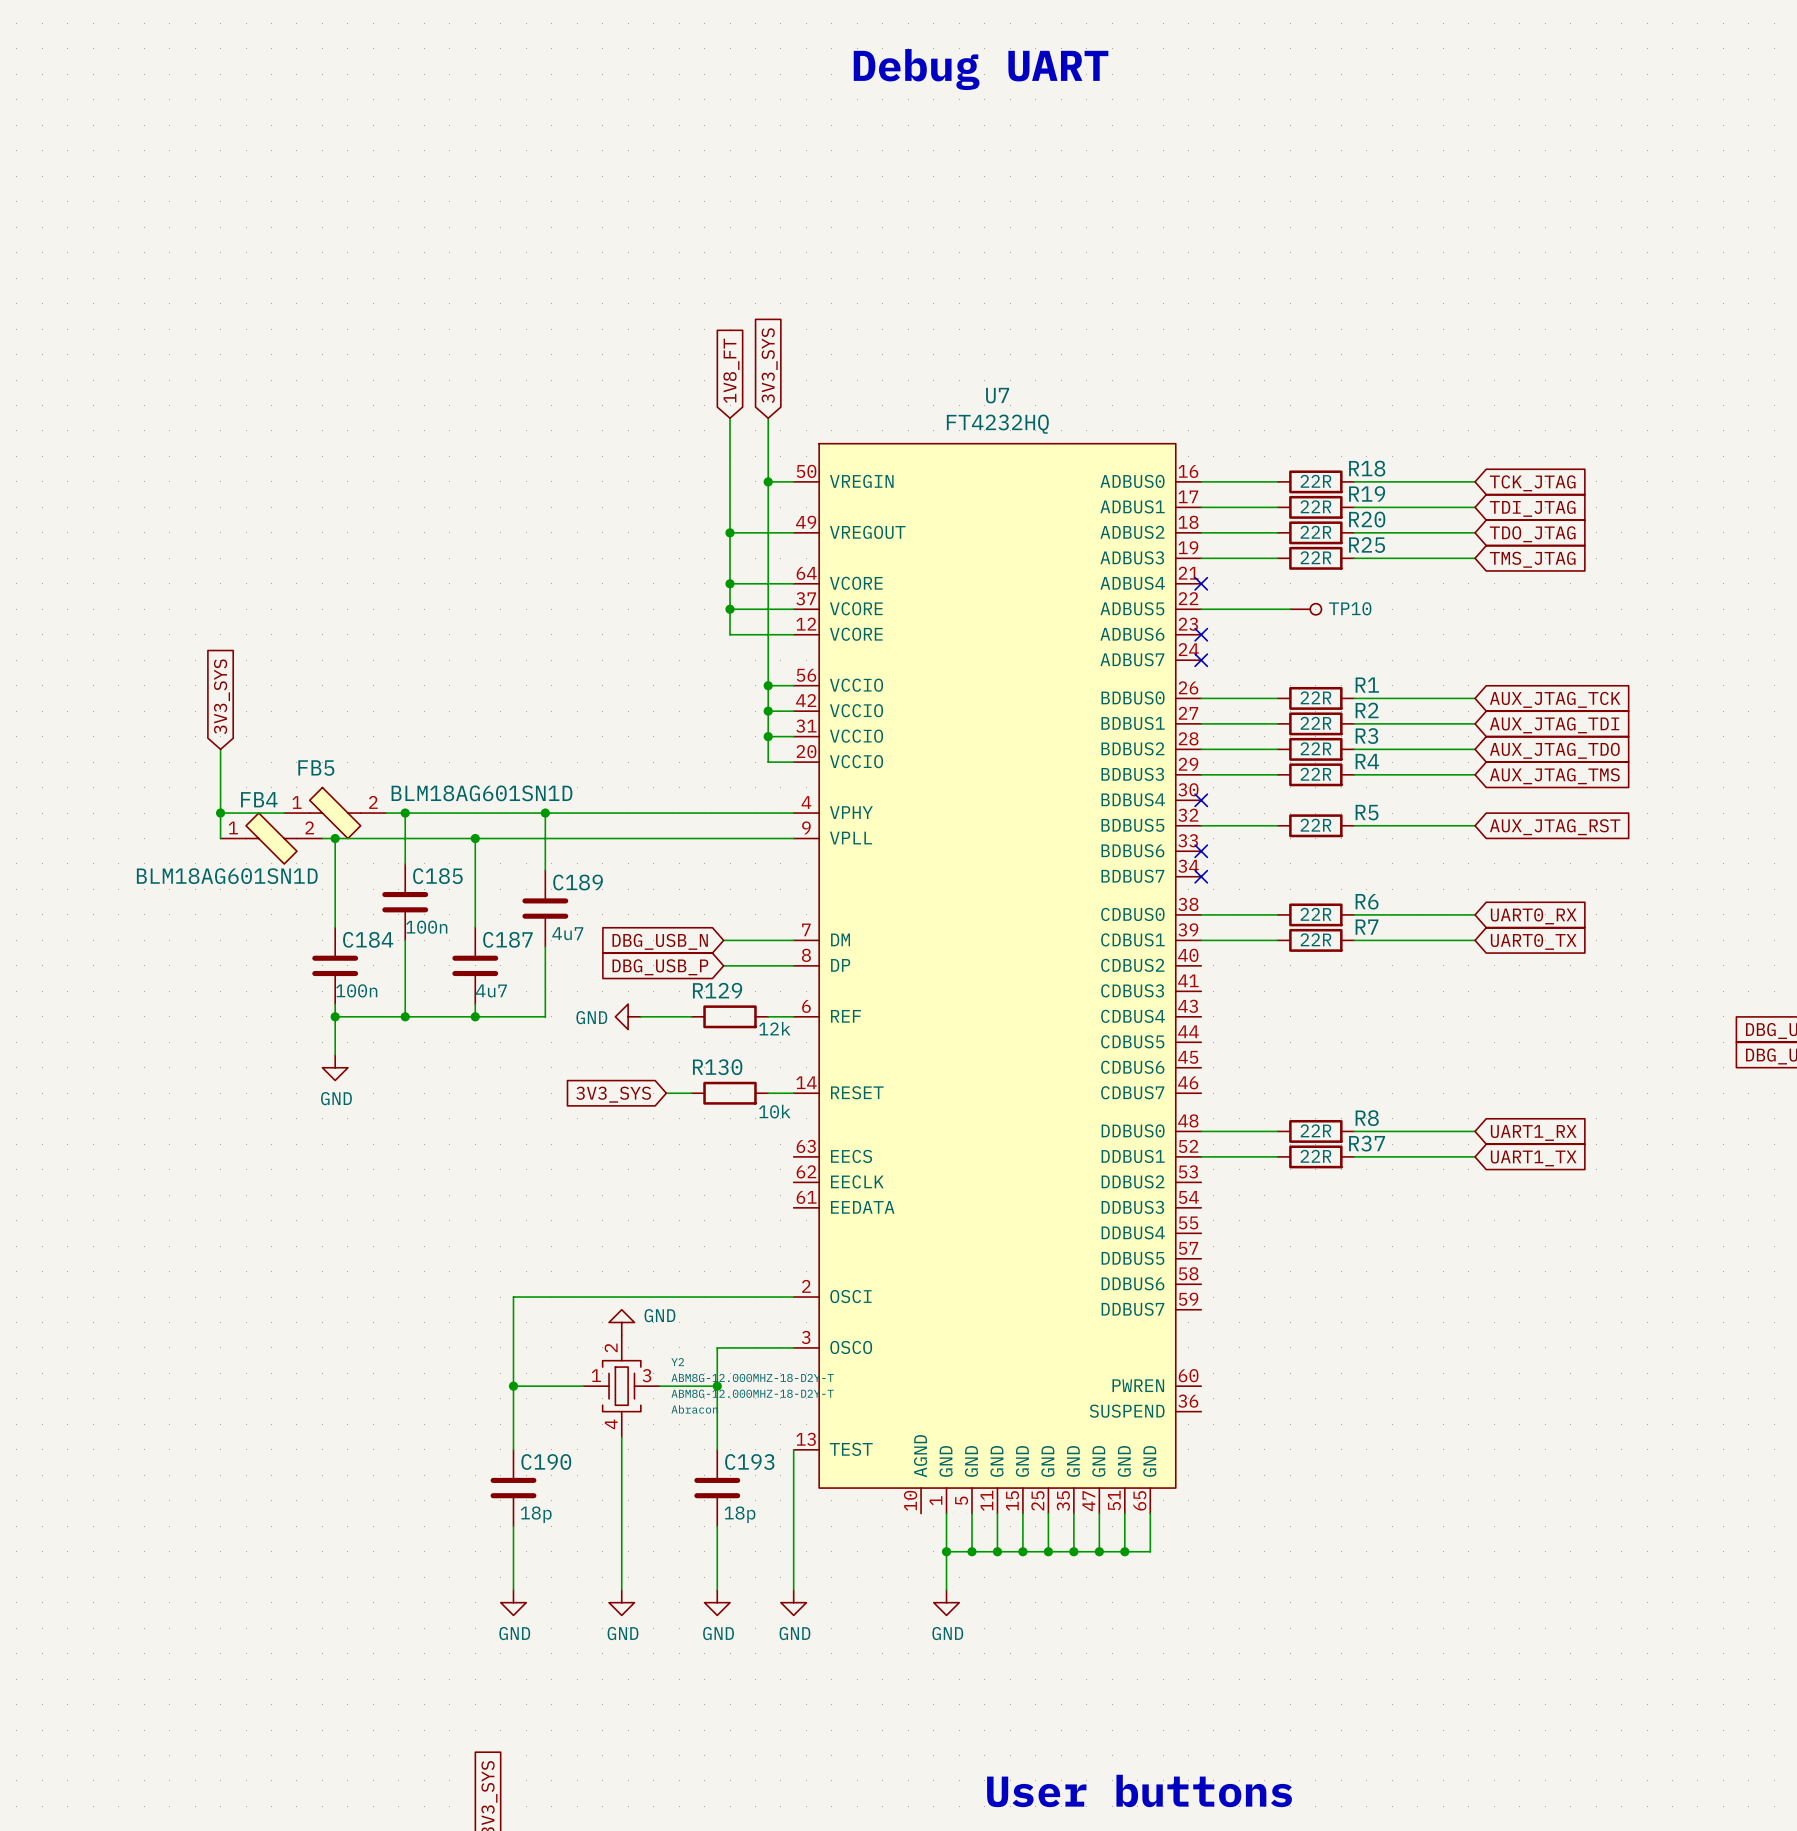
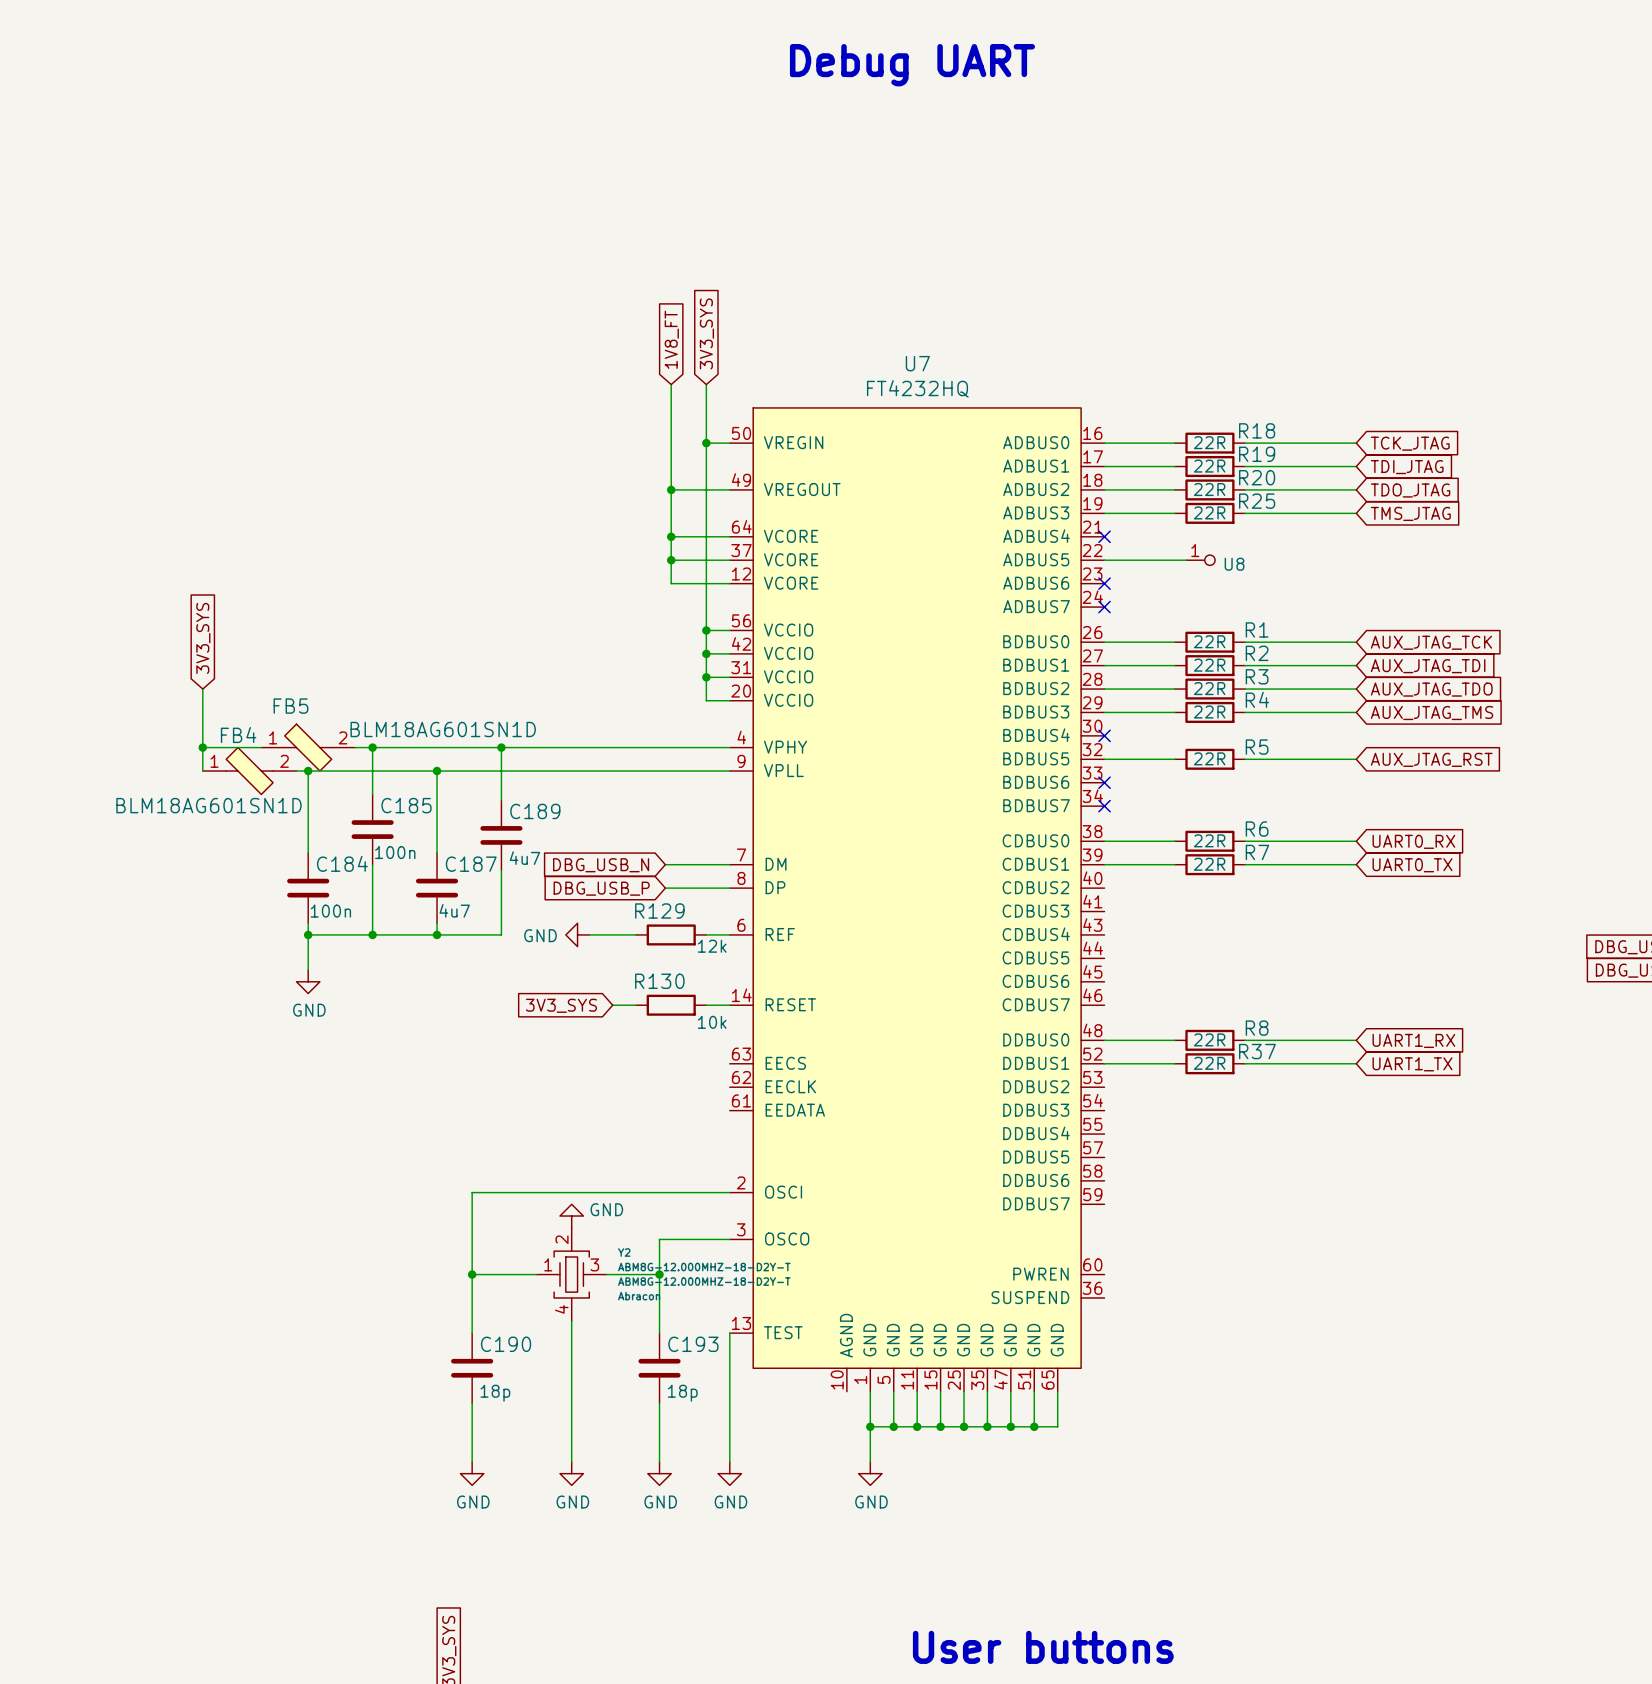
TP10 pin number: none -> 1 (1195, 550)
TP10 name: TP10 (1350, 608) -> U8 (1234, 564)

